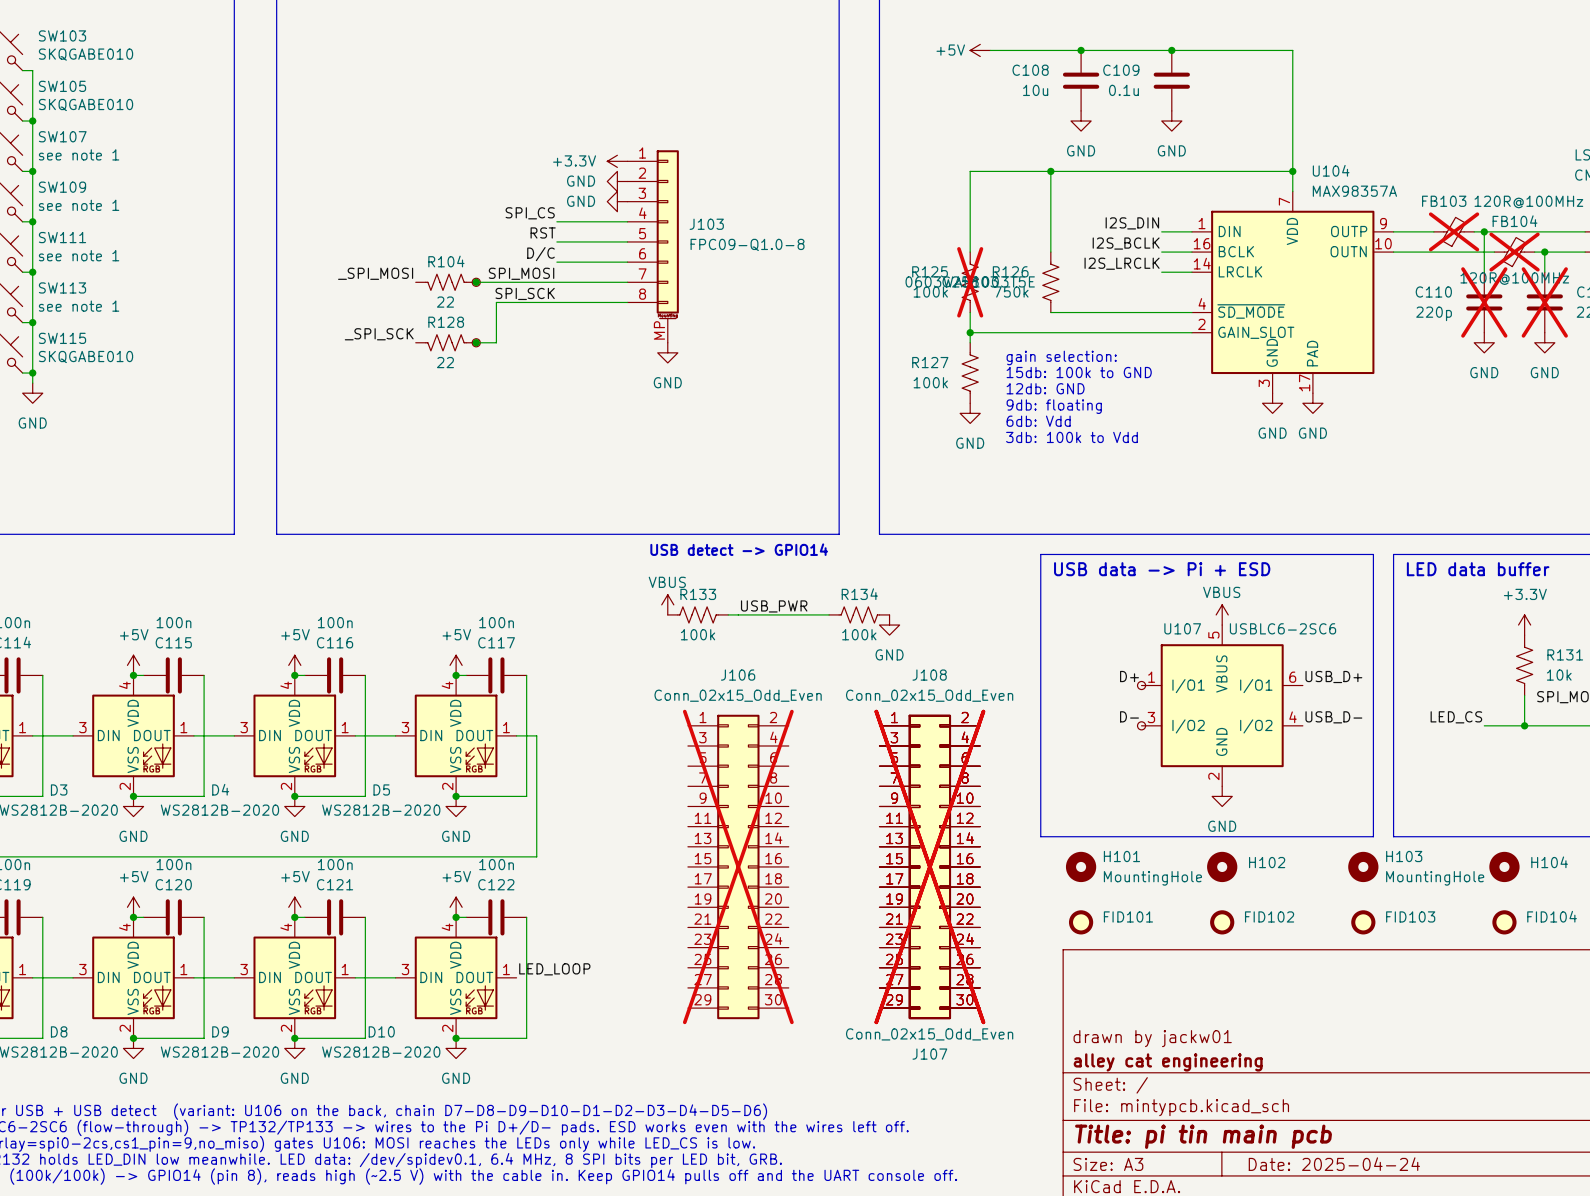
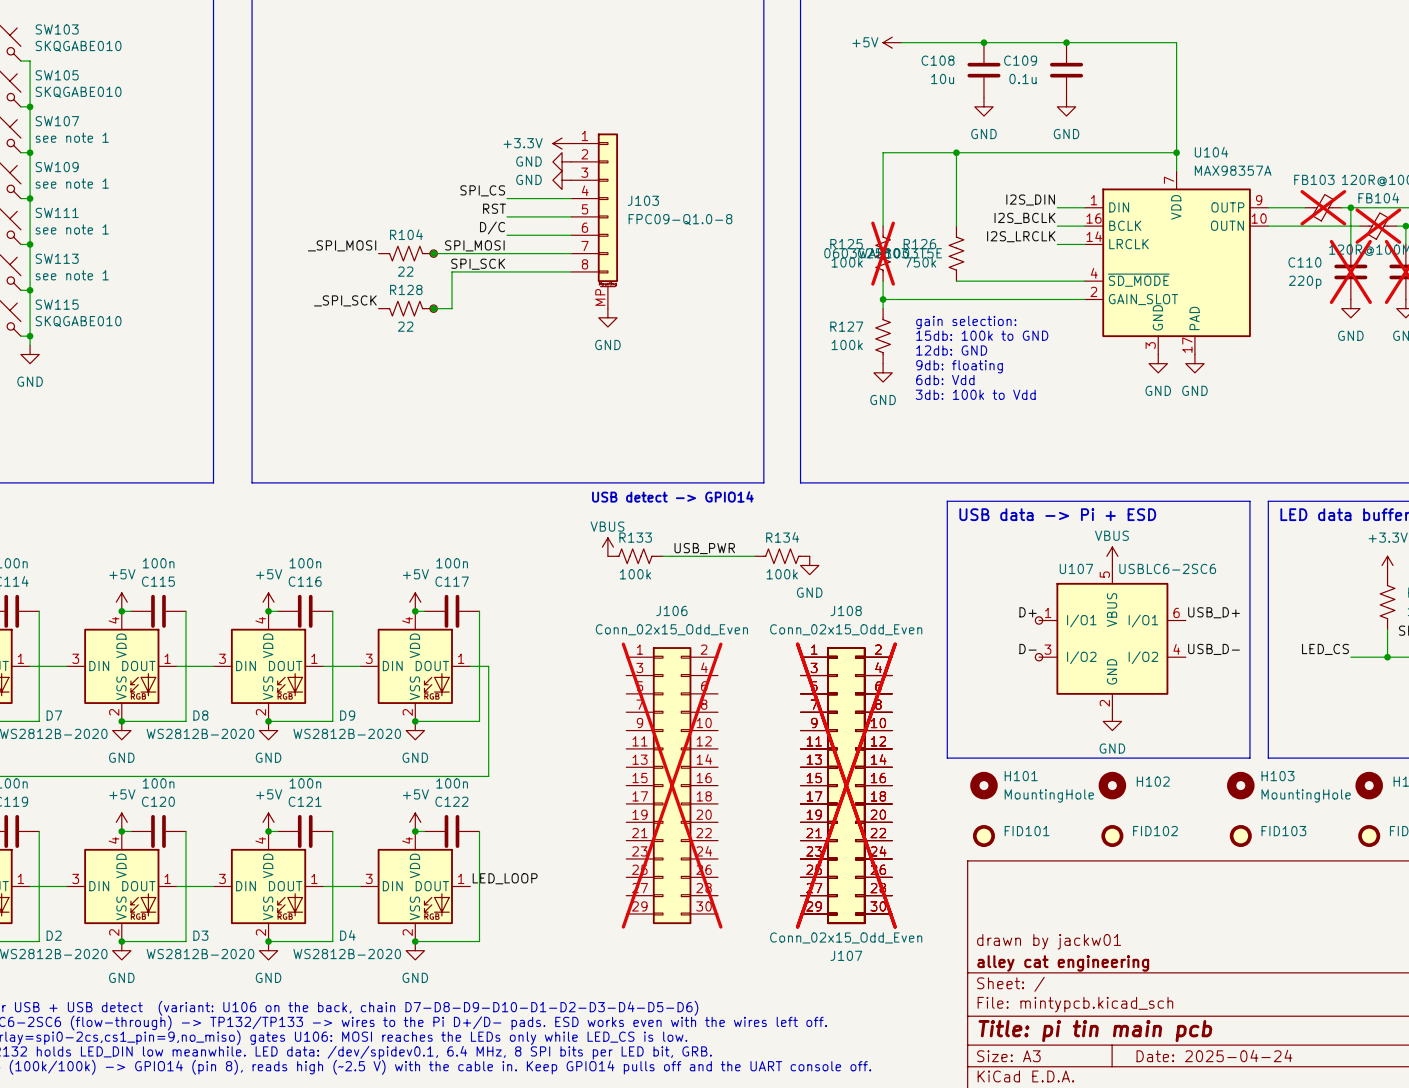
D3 name: D3 (59, 789) -> D7 (54, 715)
D4 name: D4 (220, 789) -> D8 (200, 715)
D5 name: D5 (381, 789) -> D9 (347, 715)
D8 name: D8 (59, 1031) -> D2 (54, 935)
D9 name: D9 (220, 1031) -> D3 (200, 935)
D10 name: D10 (381, 1031) -> D4 (347, 935)

